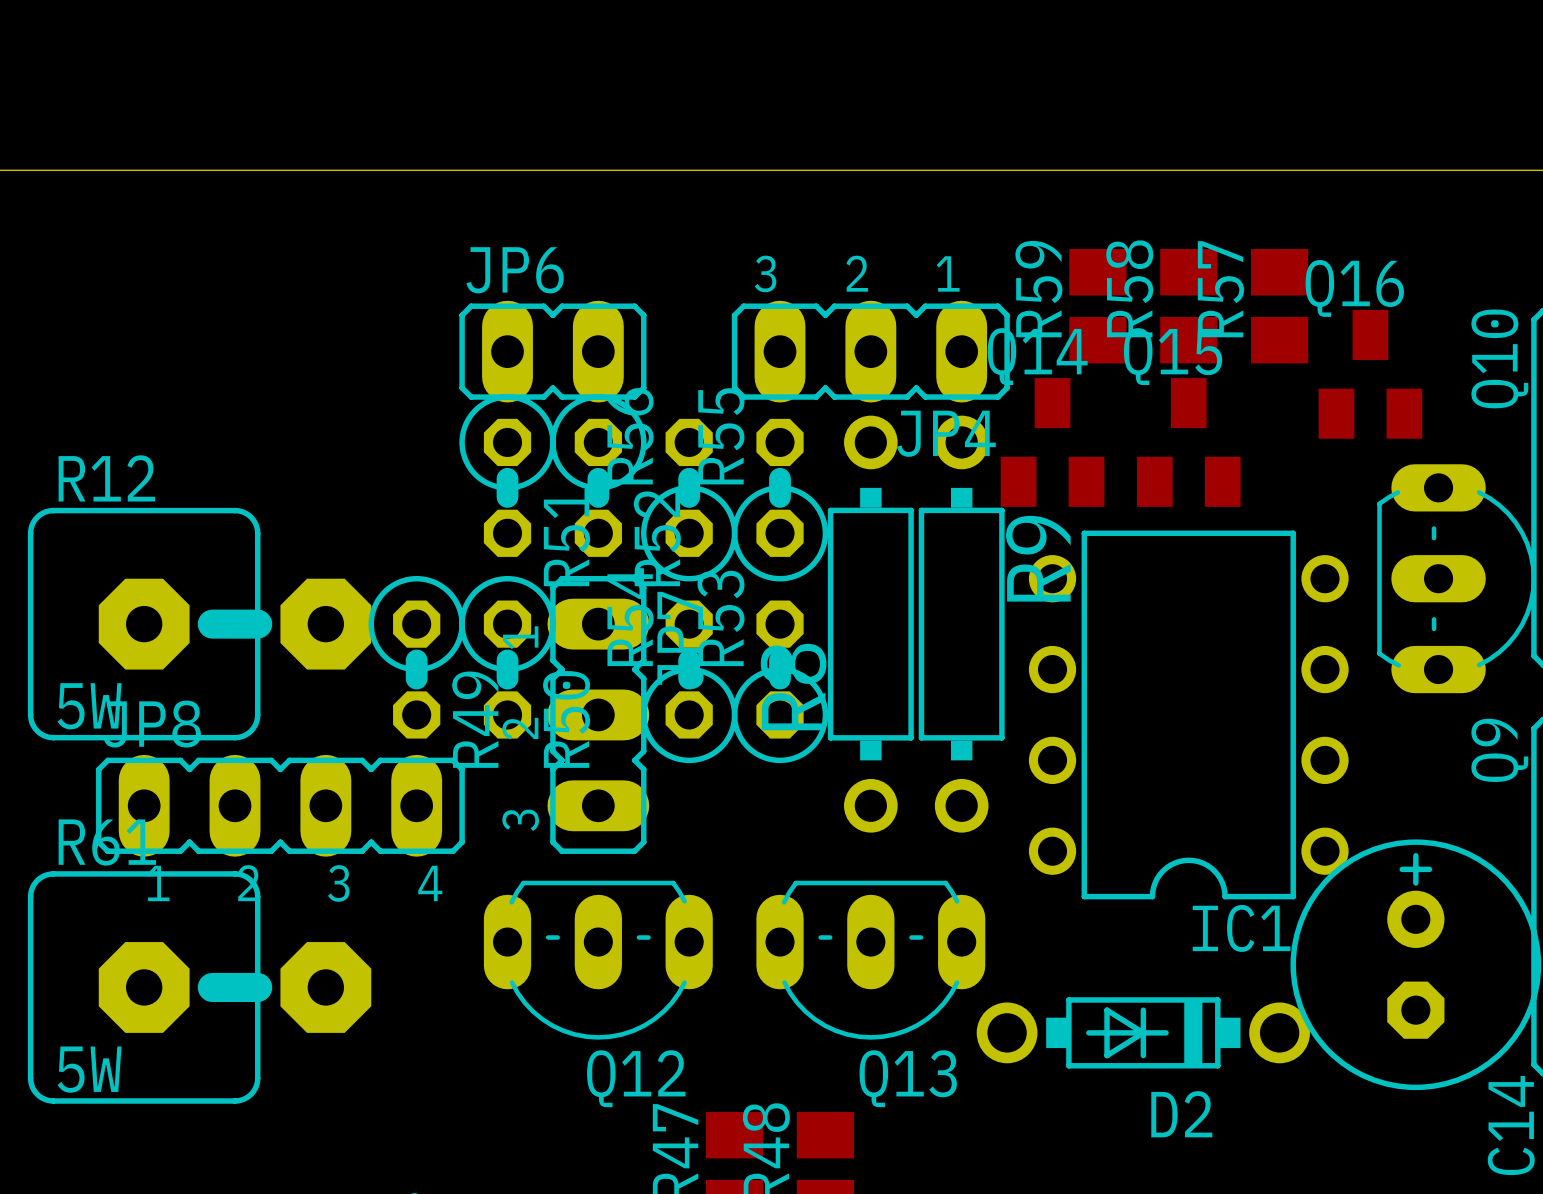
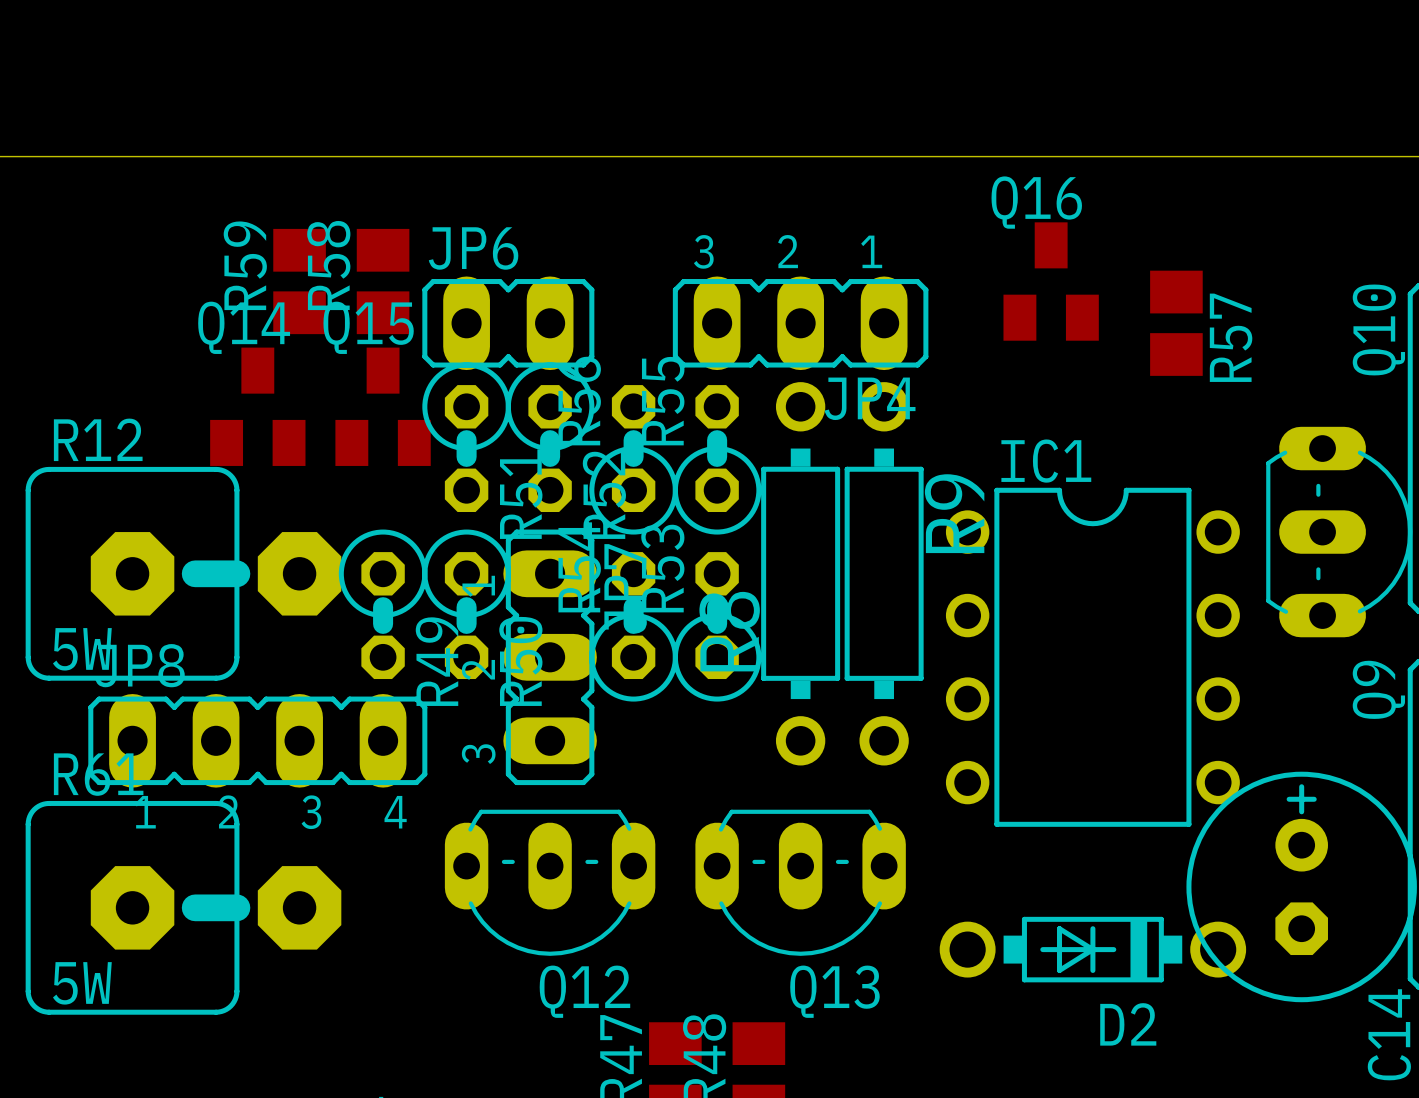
R57 name position: R57 (1220, 289) -> R57 (1231, 337)
R59 position: (1097, 306) -> (299, 281)
R58 position: (1188, 306) -> (383, 281)
R57 position: (1279, 306) -> (1176, 323)
Q16 position: (1370, 374) -> (1051, 281)
Q14 position: (1052, 442) -> (257, 406)
Q15 position: (1188, 442) -> (383, 406)
IC1 rotation: 0° (1188, 714) -> 180° (1092, 657)
D2 position: (1143, 1032) -> (1092, 949)

